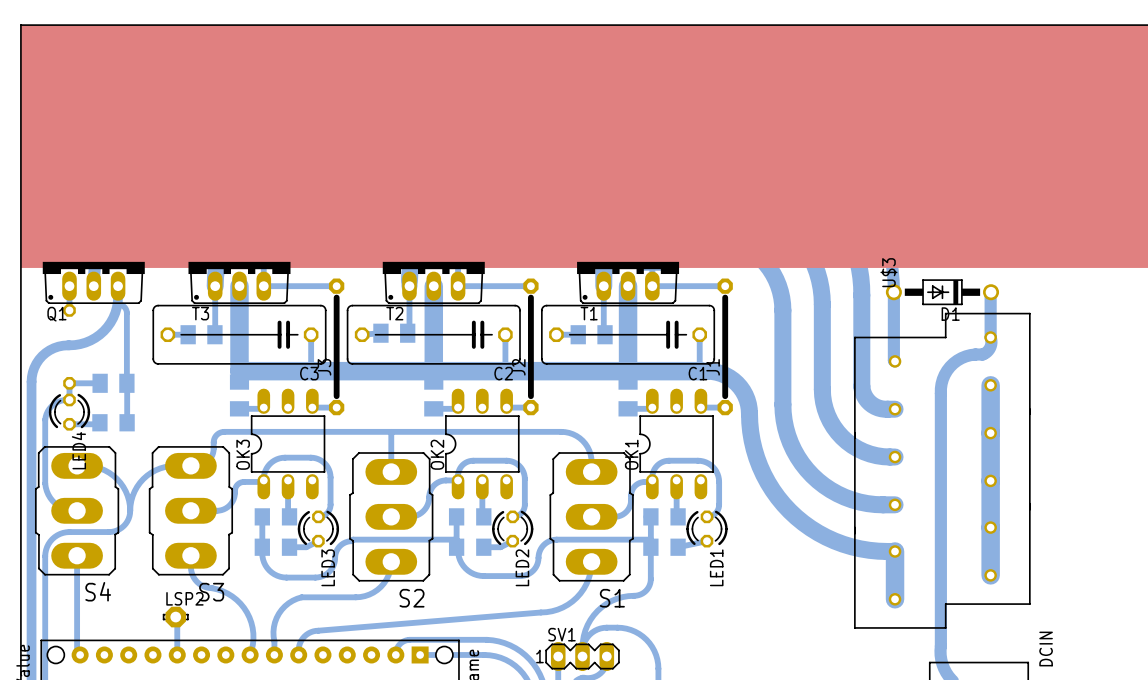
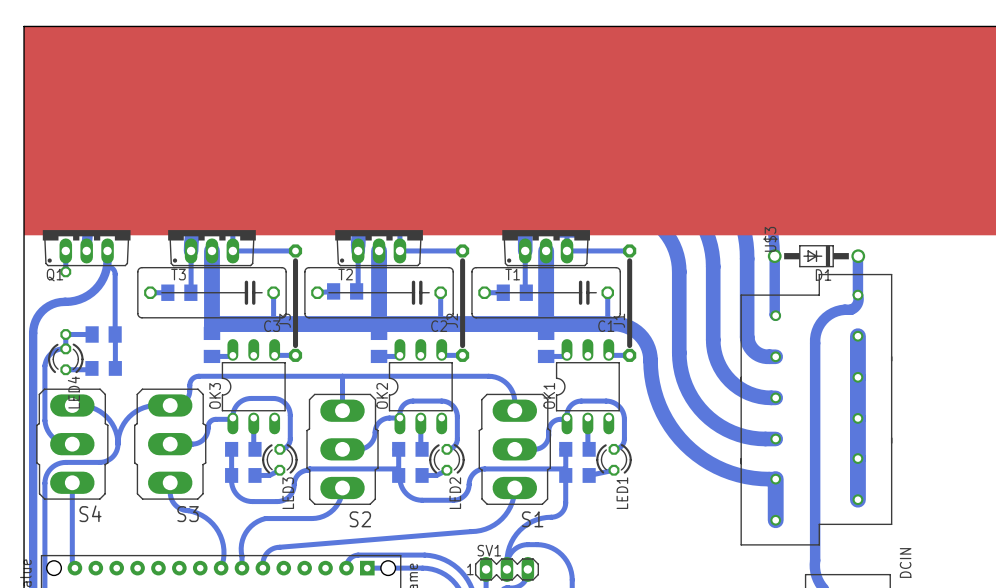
bottom track: (175, 617) (177, 654) -> none
LSP2: (175, 617) -> none

